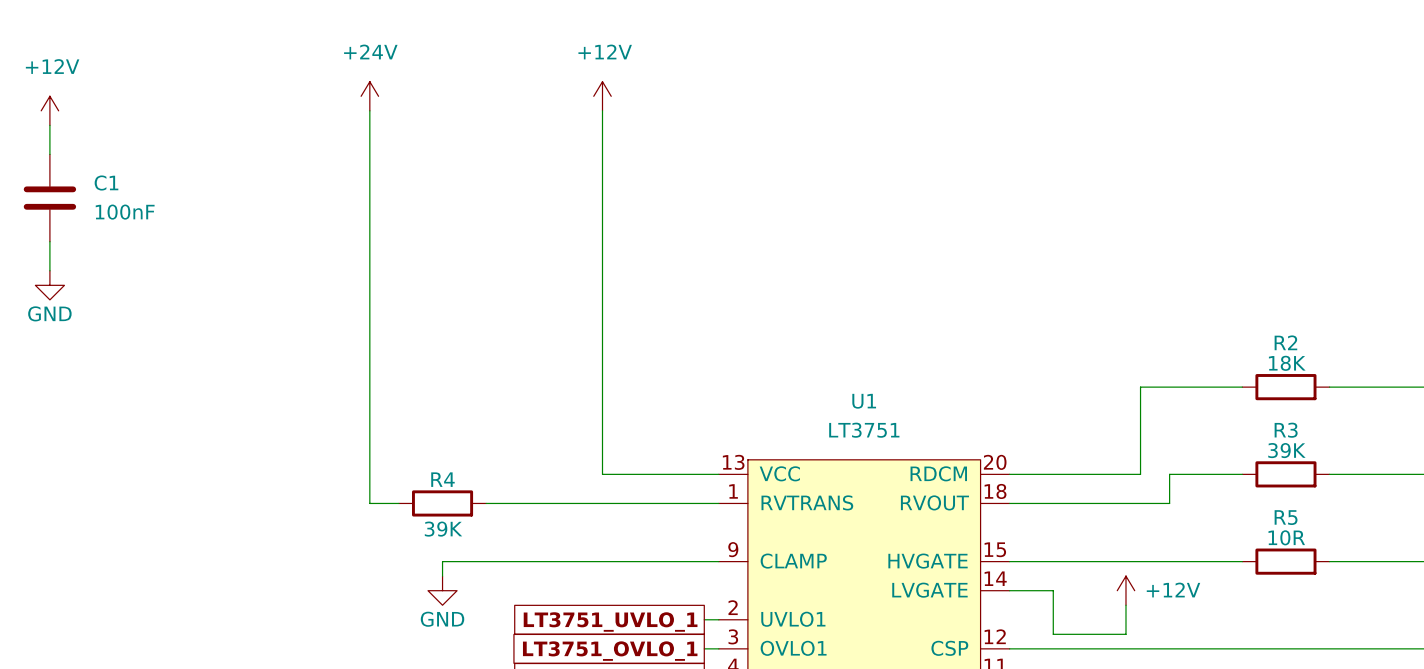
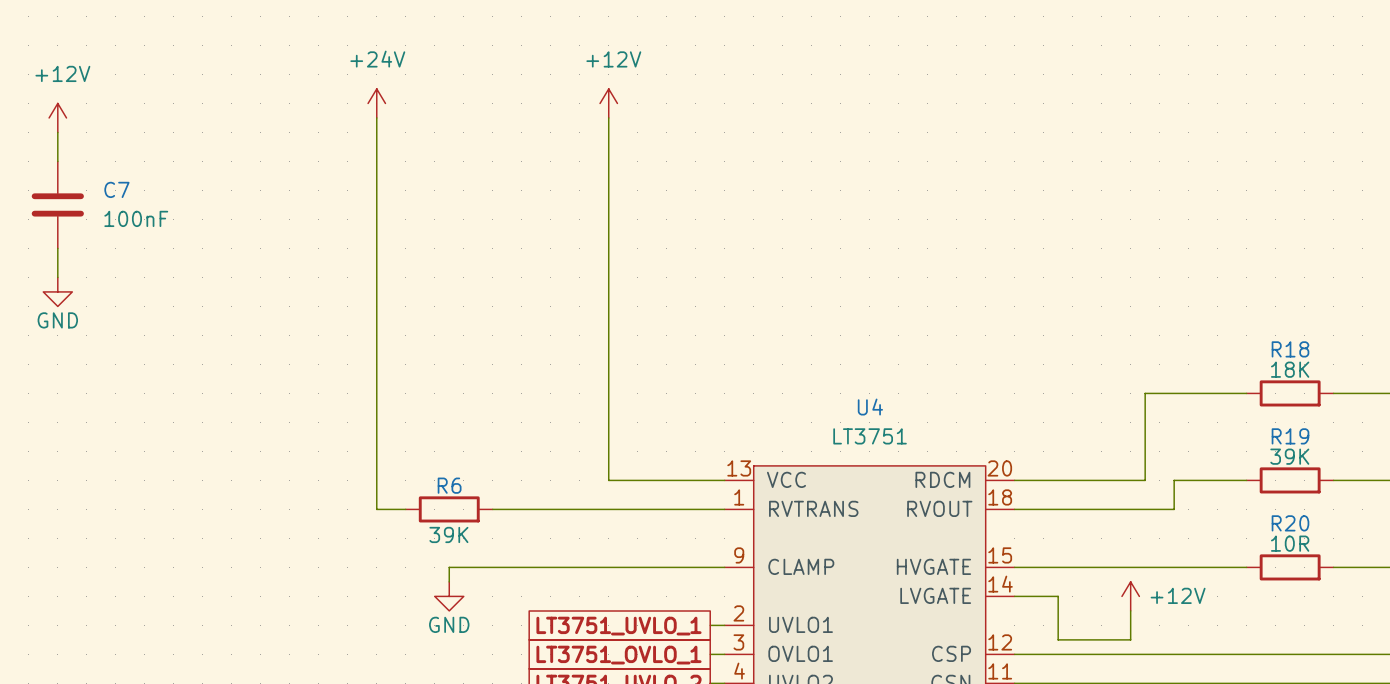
C1 name: C1 (106, 183) -> C7 (116, 189)
R2 name: R2 (1285, 342) -> R18 (1290, 349)
U1 name: U1 (864, 401) -> U4 (870, 407)
R3 name: R3 (1286, 430) -> R19 (1290, 436)
R4 name: R4 (442, 479) -> R6 (449, 485)
R5 name: R5 (1286, 517) -> R20 (1290, 523)

